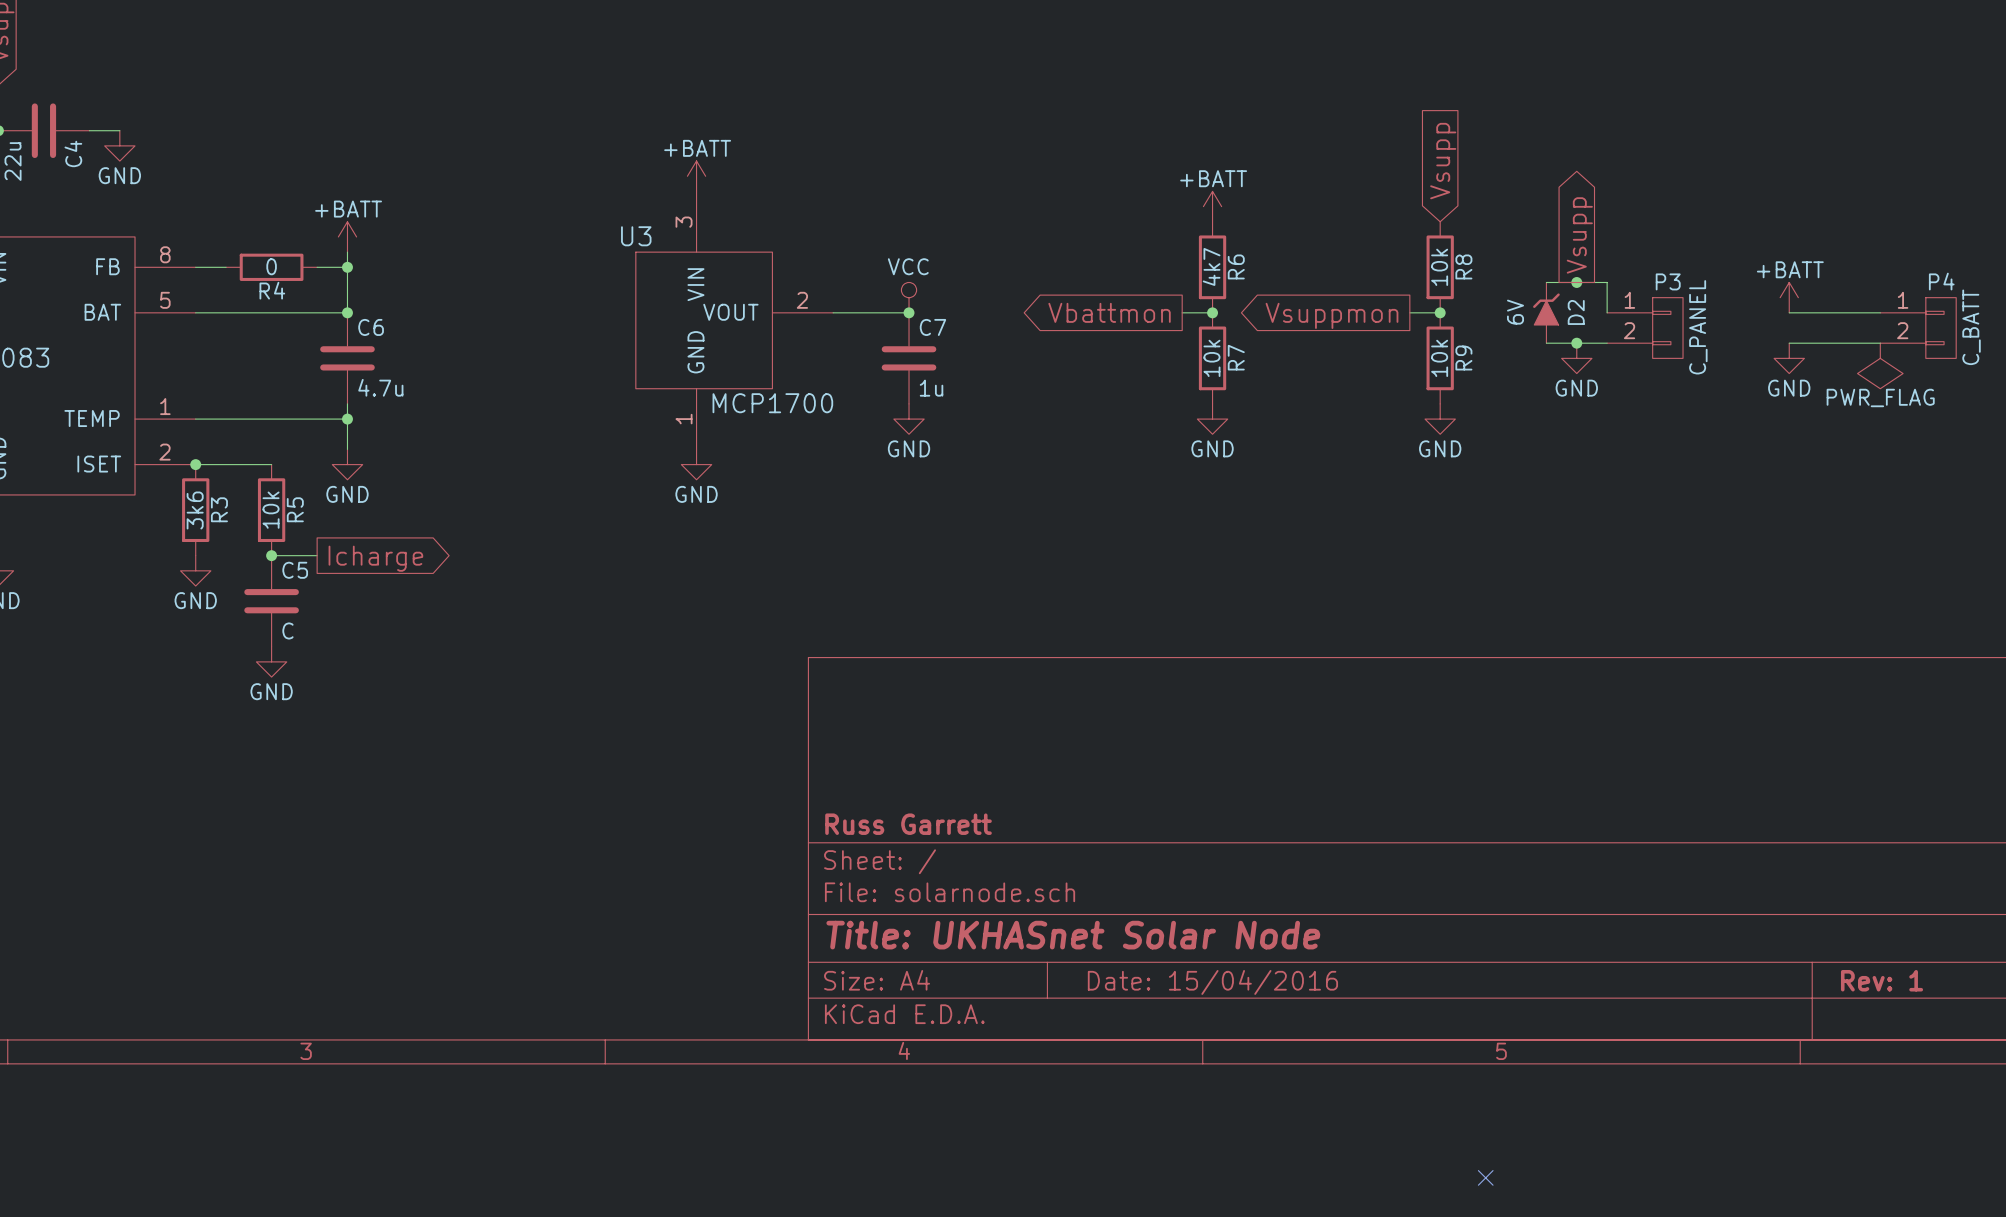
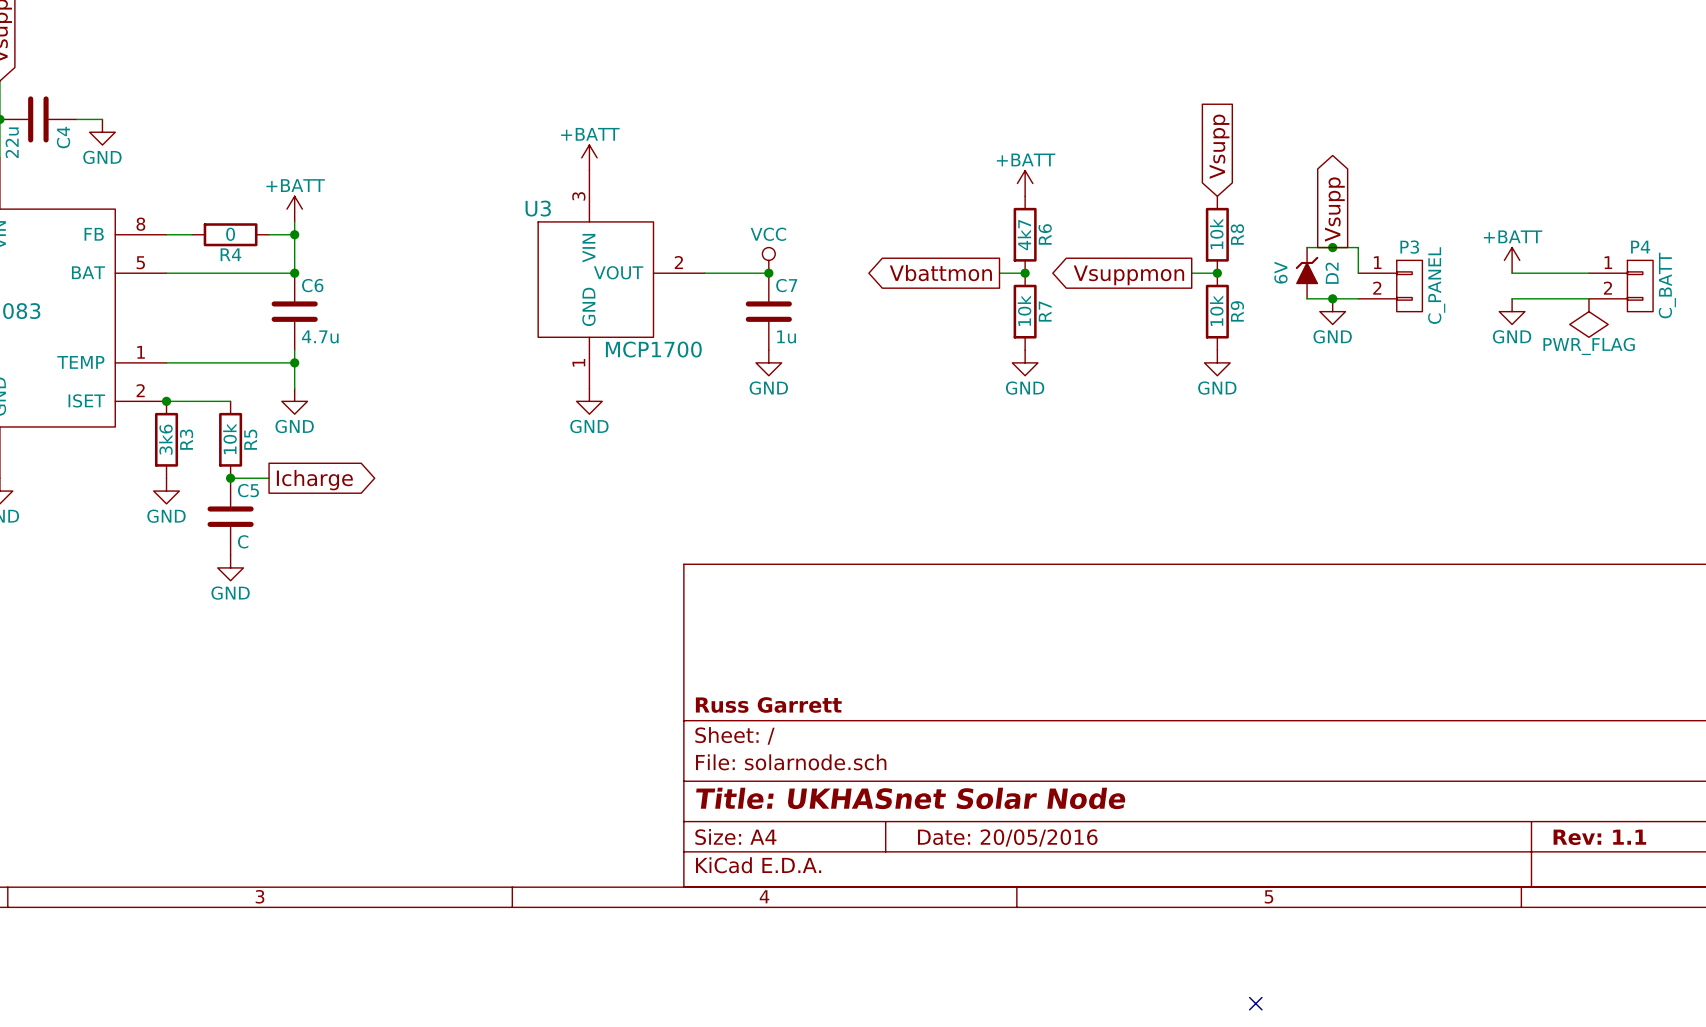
title block: Rev: 1 (1882, 980) -> Rev: 1.1 (1599, 837)
title block: Date: 15/04/2016 (1212, 982) -> Date: 20/05/2016 (1007, 838)

